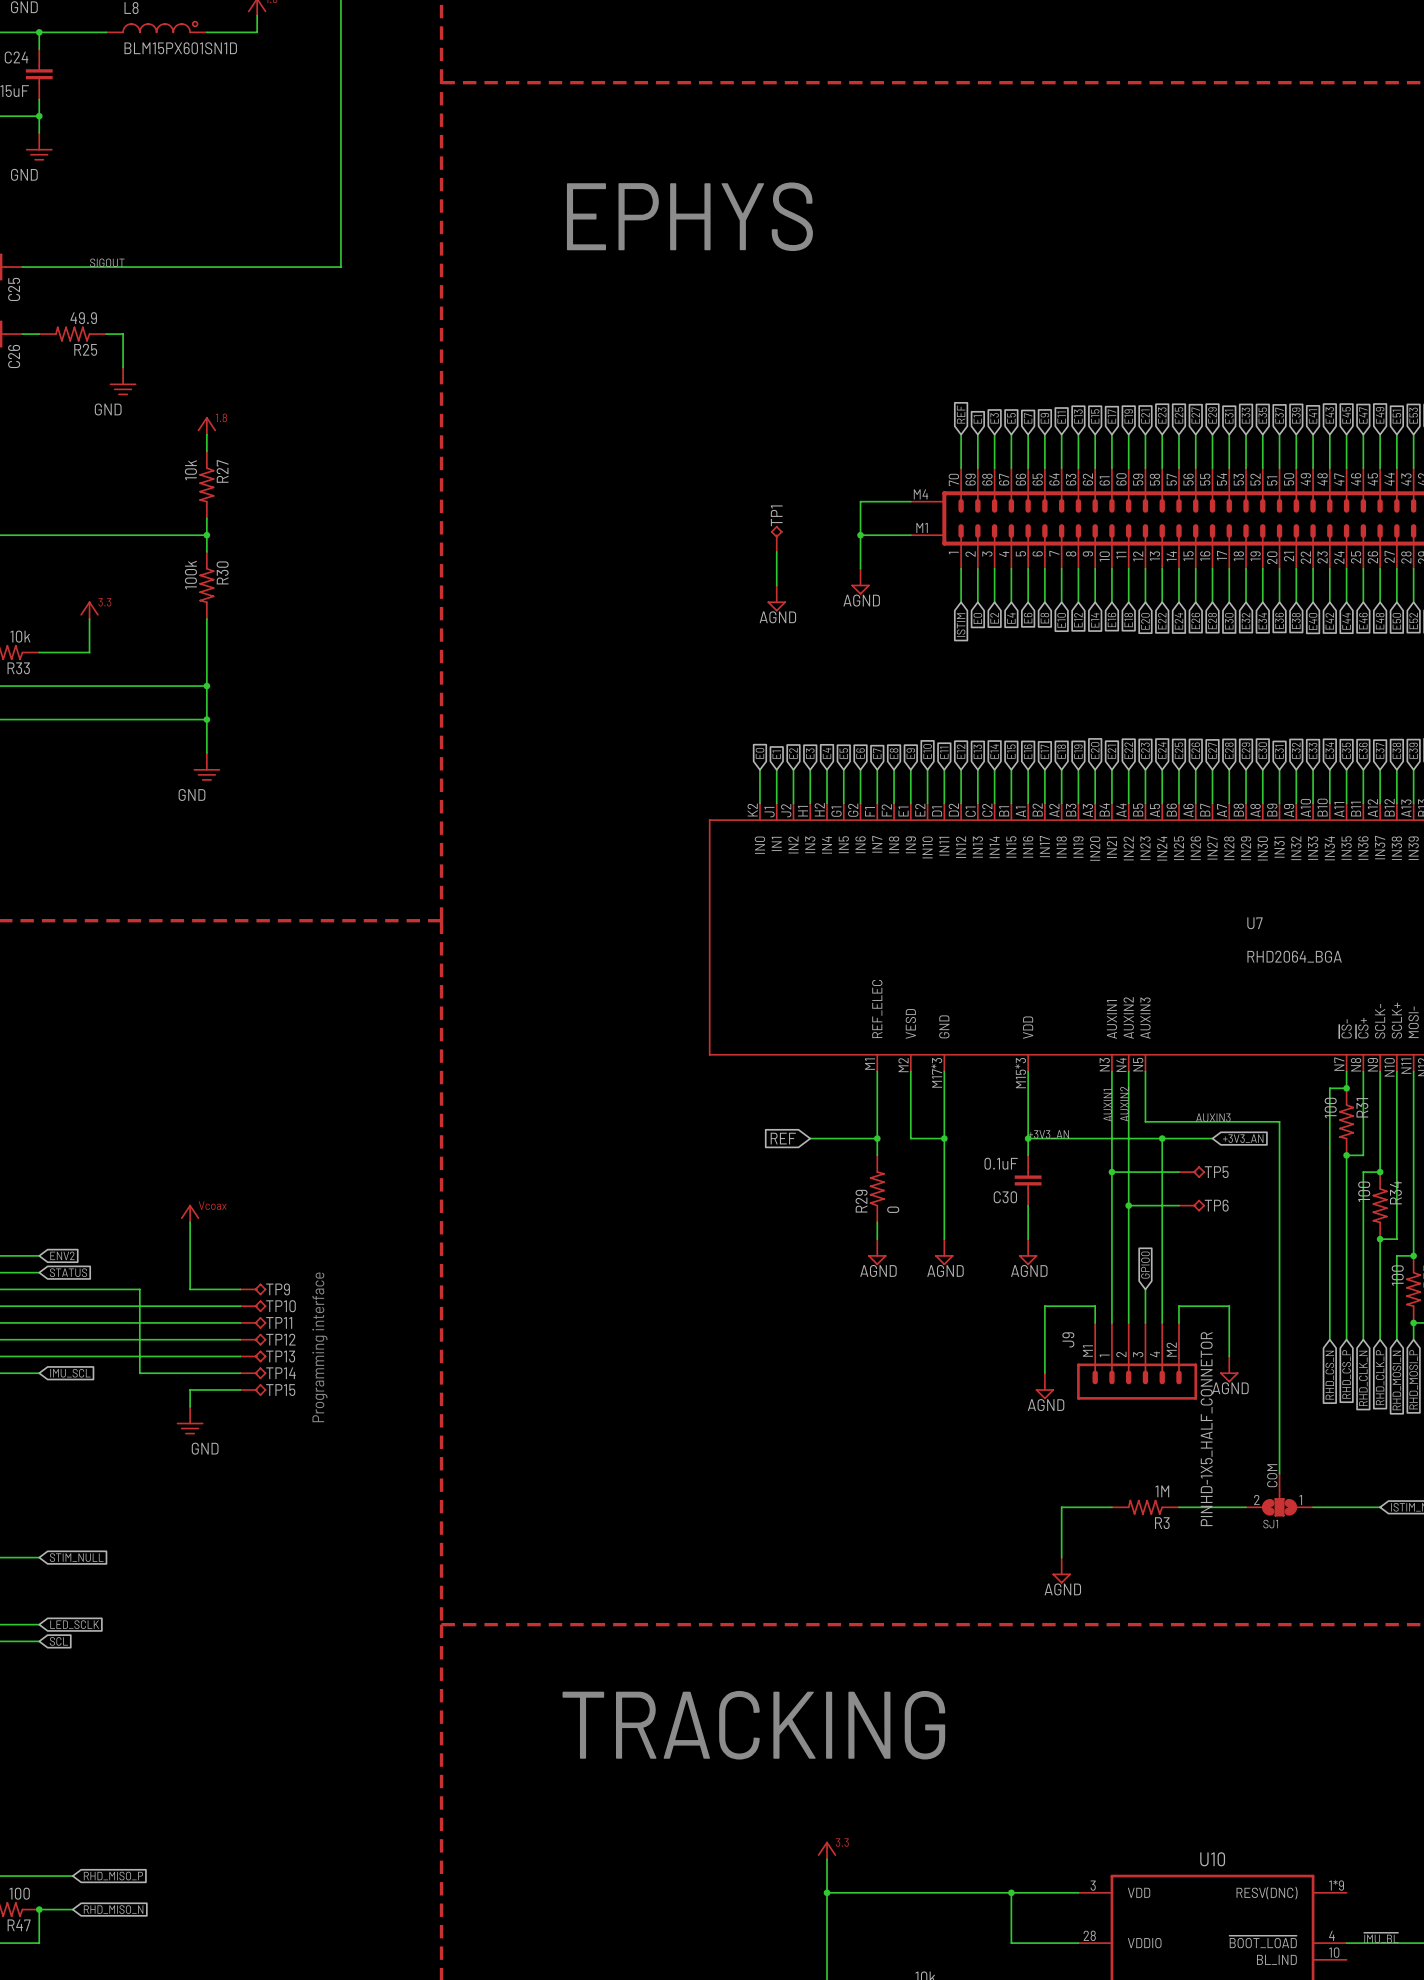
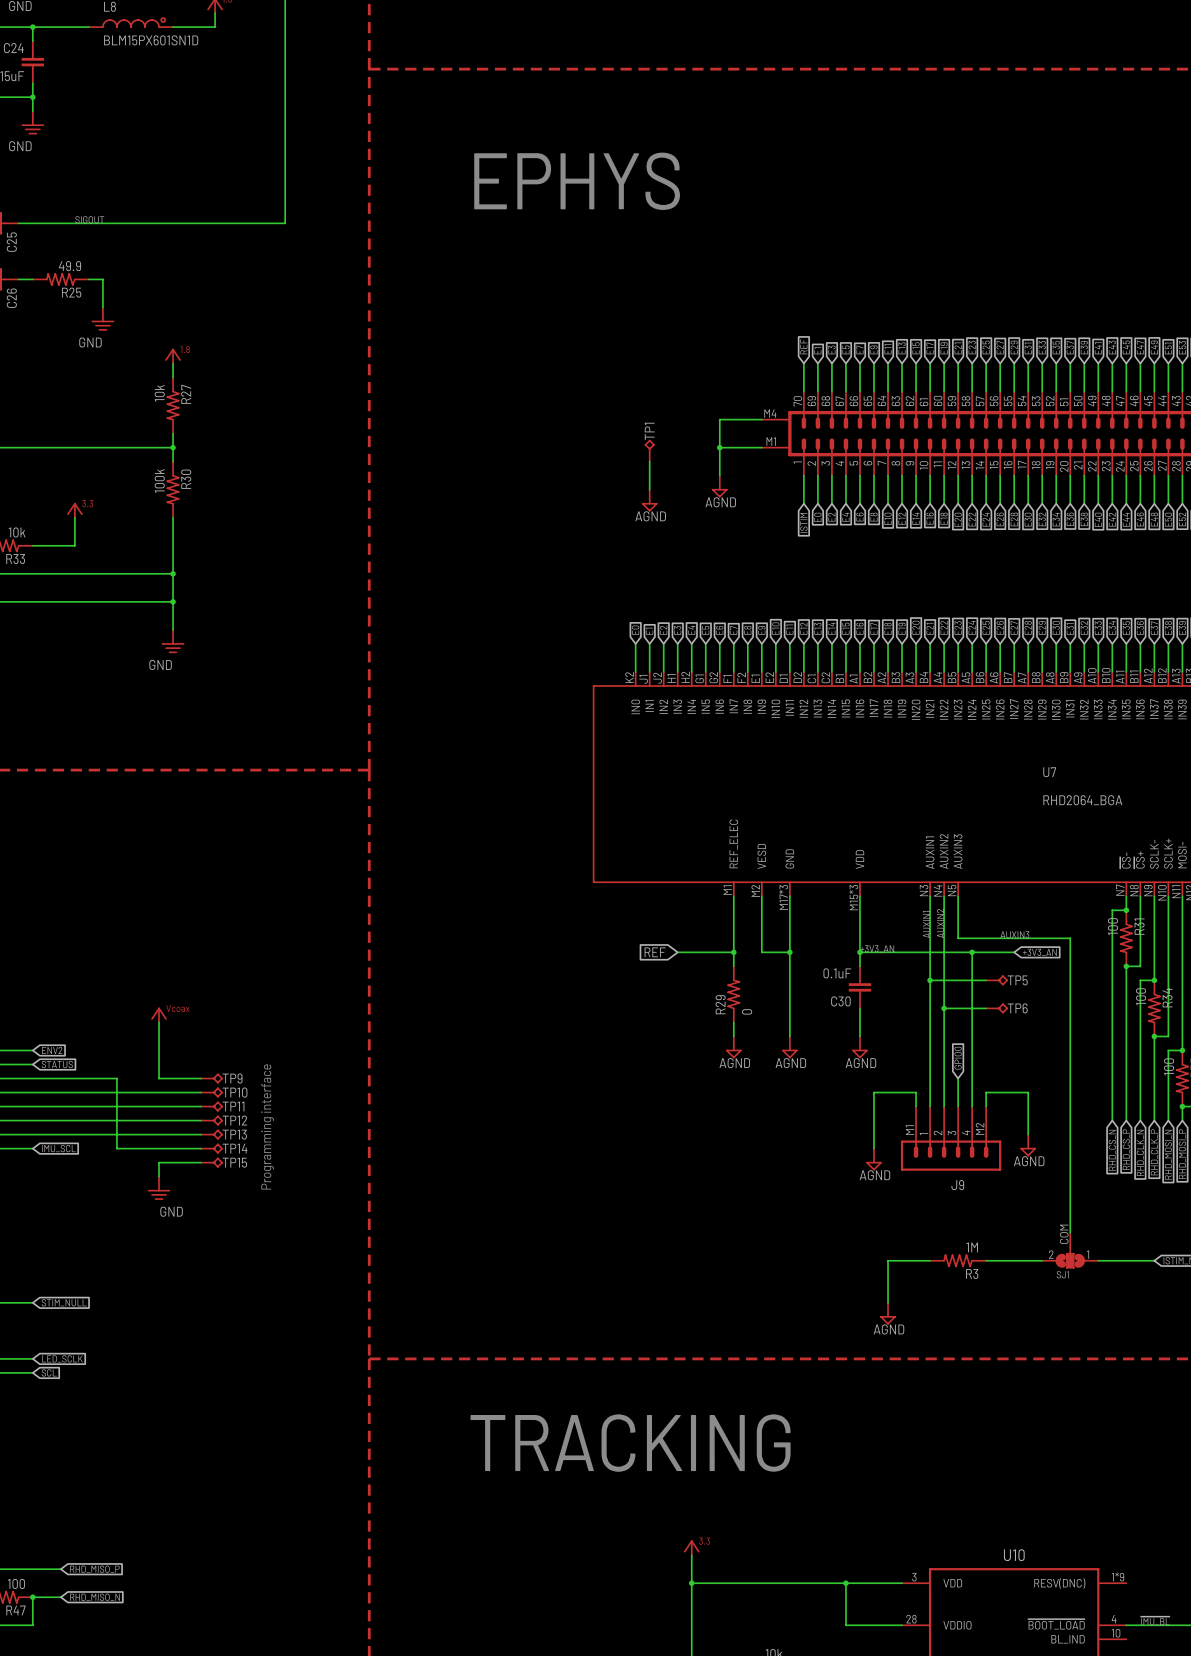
J9 name rotation: 0° (1068, 1339) -> 90° clockwise (957, 1185)
J9 name position: J9 (1068, 1339) -> J9 (957, 1185)
J9 value: PINHD-1X5_HALF_CONNETOR (1206, 1429) -> none

